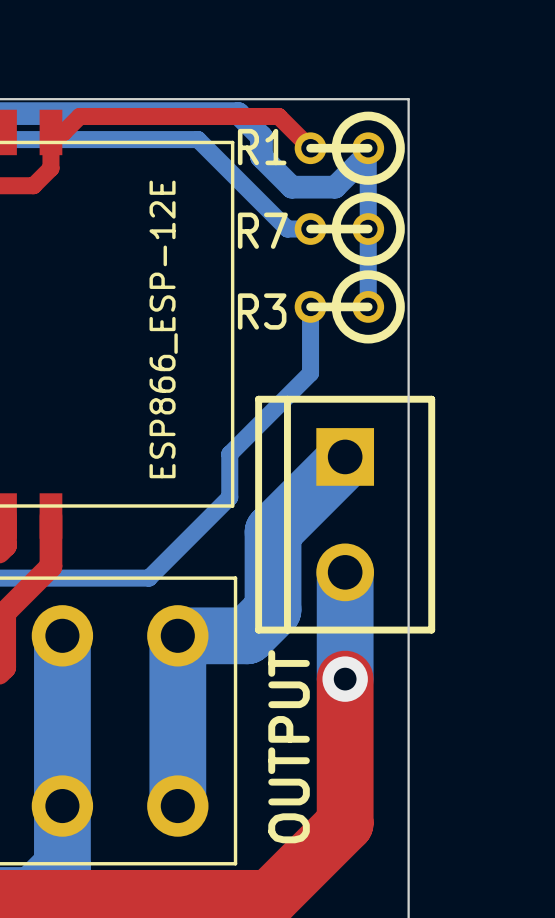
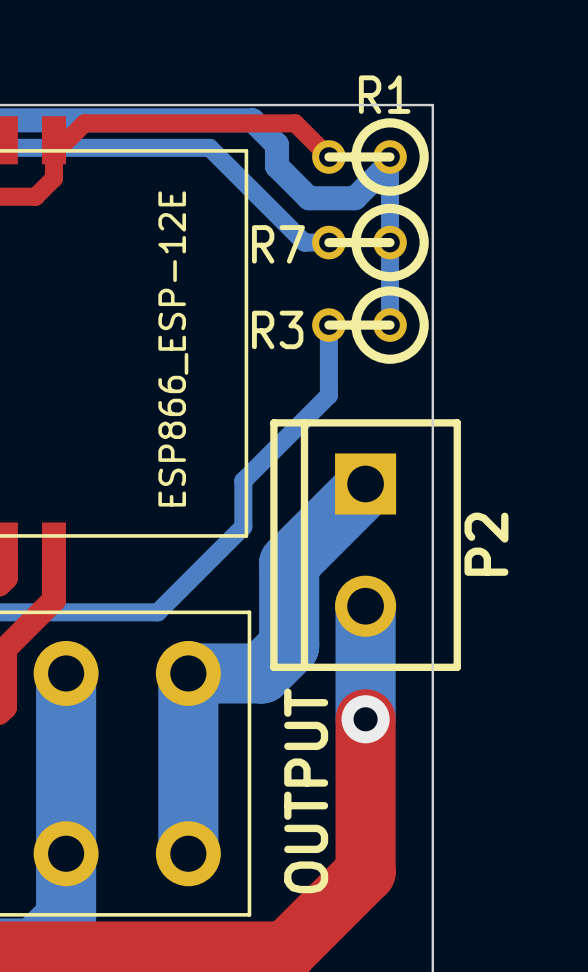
R1 name position: R1 (262, 147) -> R1 (384, 94)
P2 name: none -> P2 (486, 544)

